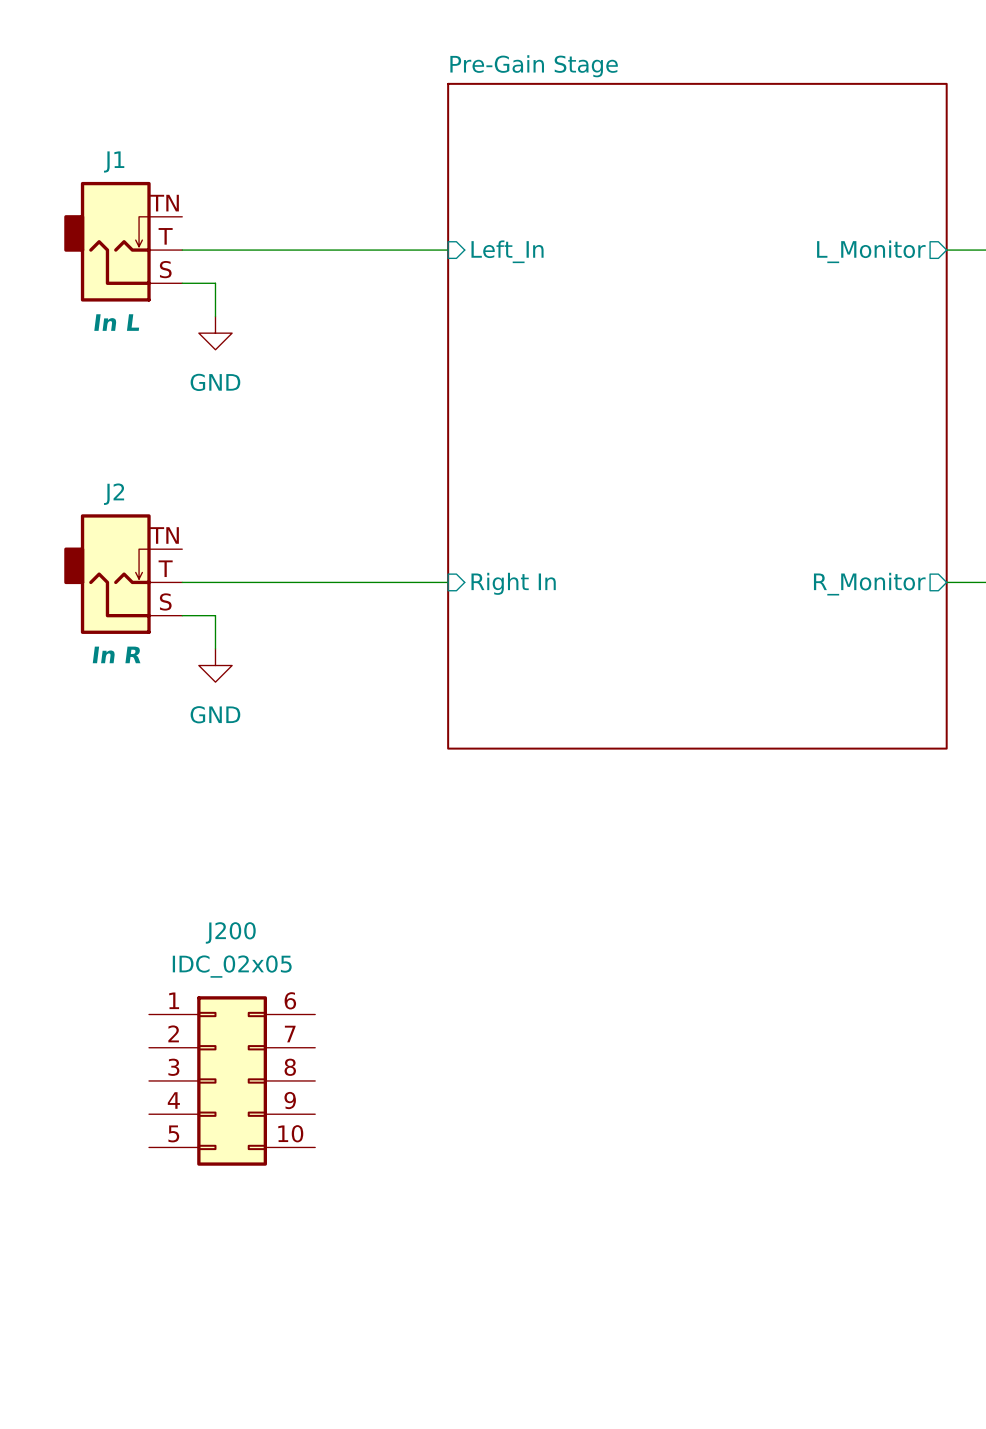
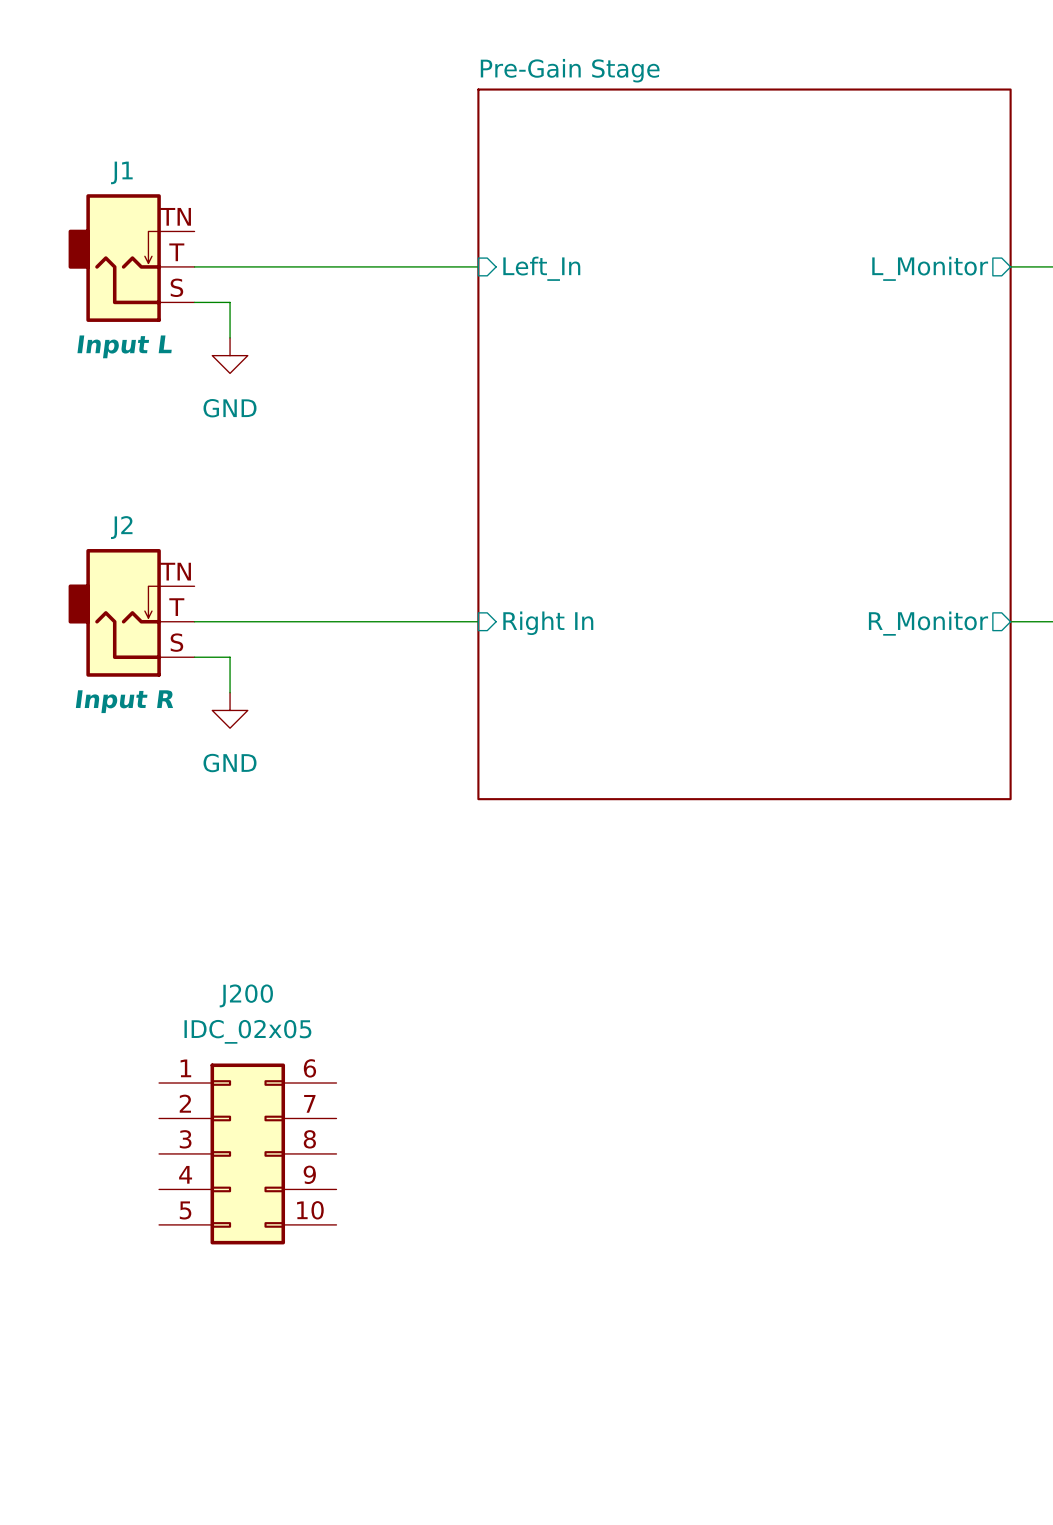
J1 text: In L (116, 322) -> Input L (124, 346)
J2 text: In R (116, 654) -> Input R (124, 701)

